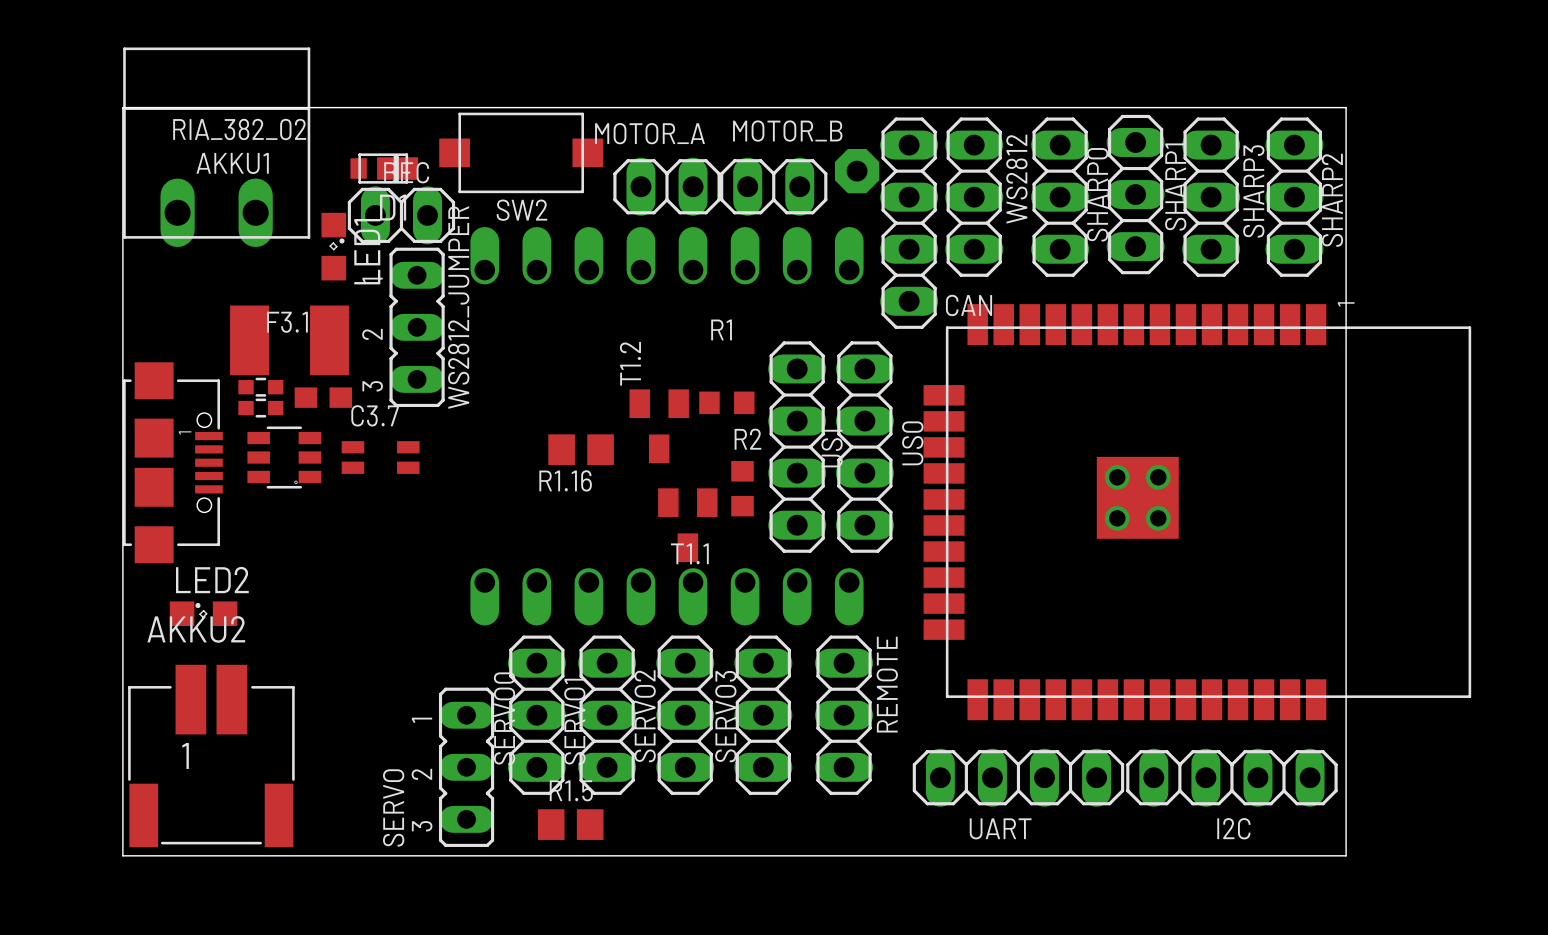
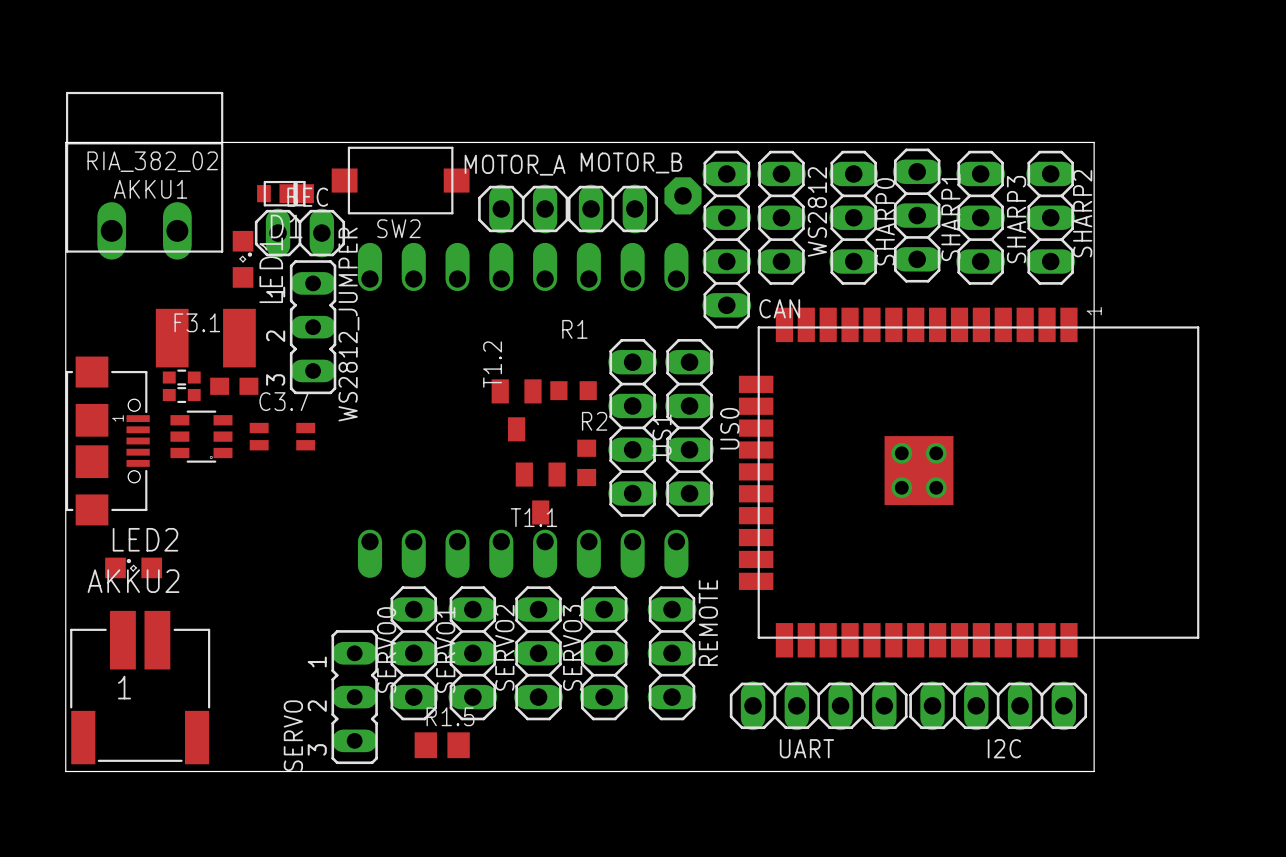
R1.16: (581, 449) -> none

